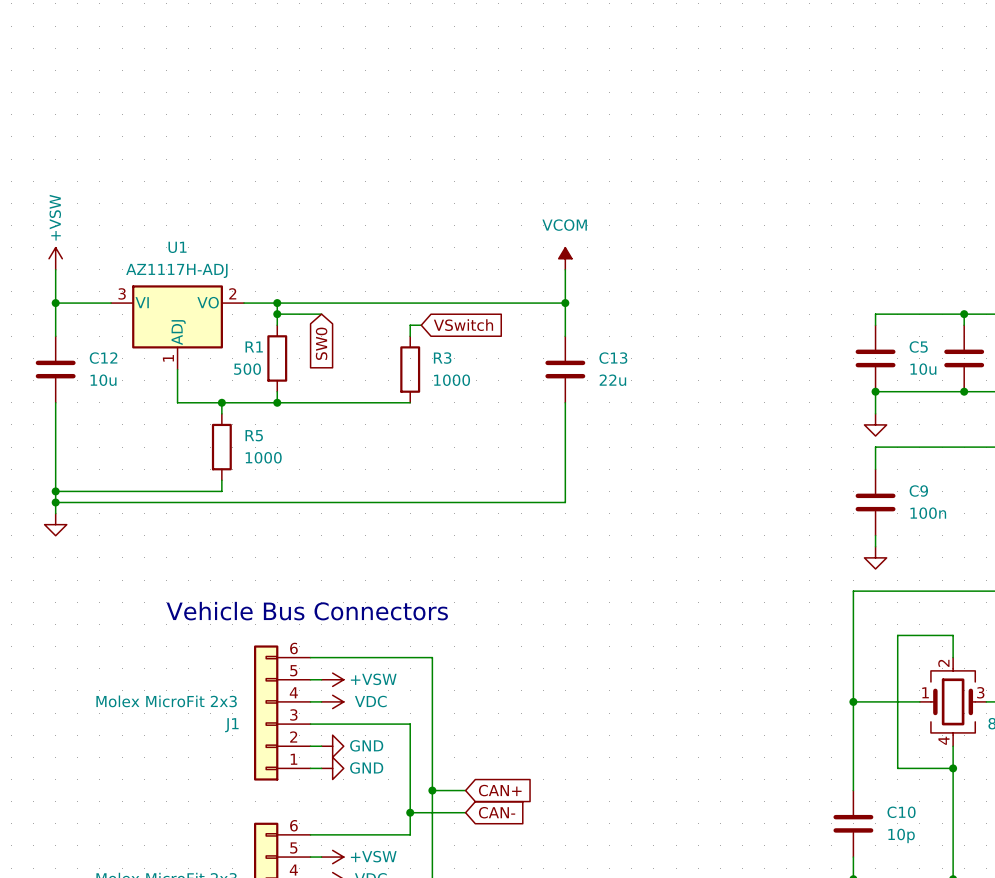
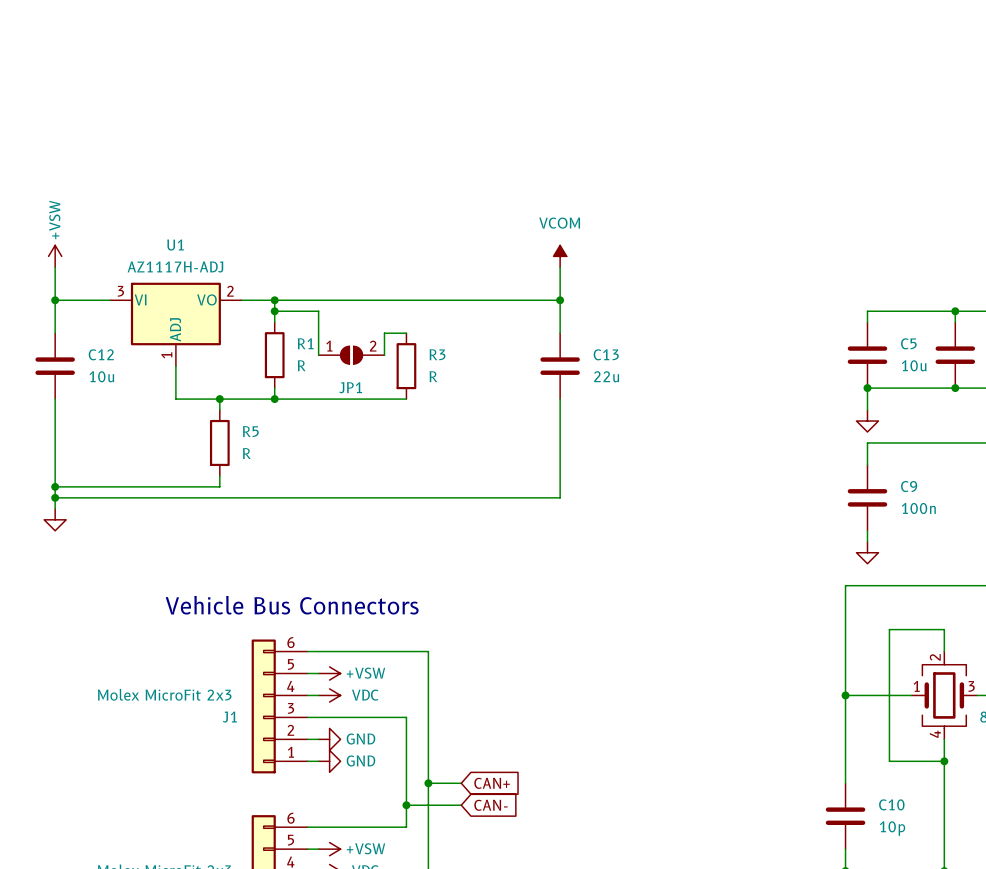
wire: none -> (318, 311) (318, 355)
wire: (421, 325) (410, 325) (410, 336) -> (384, 355) (384, 333) (406, 333)
global label: VSwitch (463, 325) -> none
global label: SW0 (321, 343) -> none
R1 name position: R1 (254, 346) -> R1 (305, 343)
JP1: none -> (351, 355)
R1 value: 500 (247, 369) -> R (301, 365)
R3 value: 1000 (452, 380) -> R (433, 376)
R5 value: 1000 (263, 457) -> R (246, 453)

